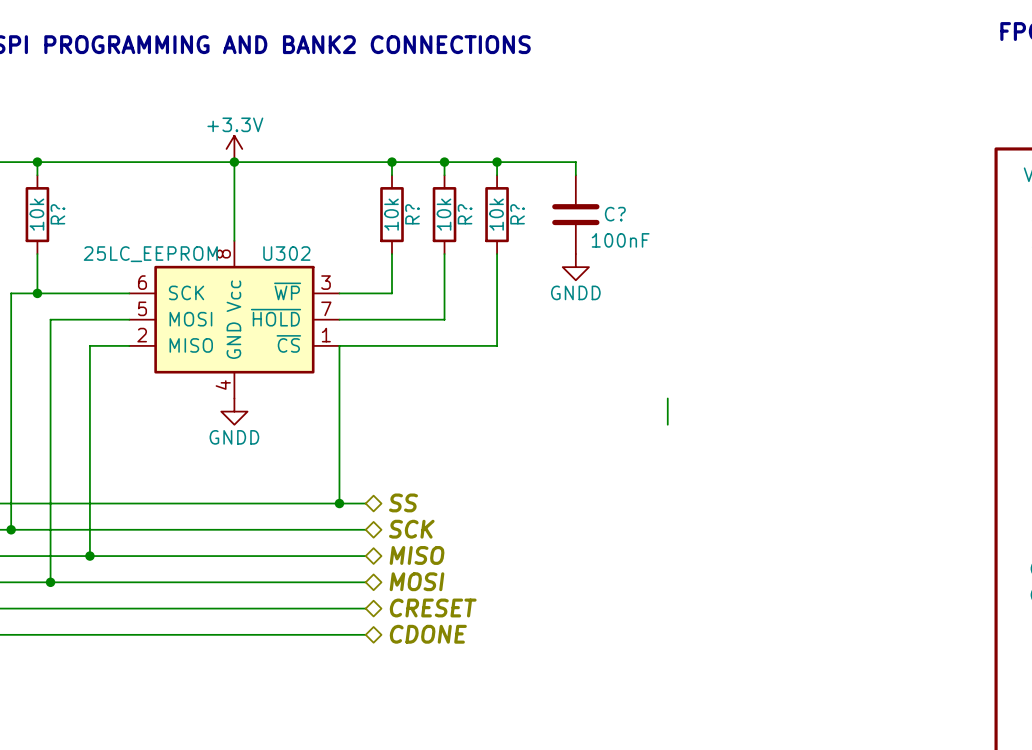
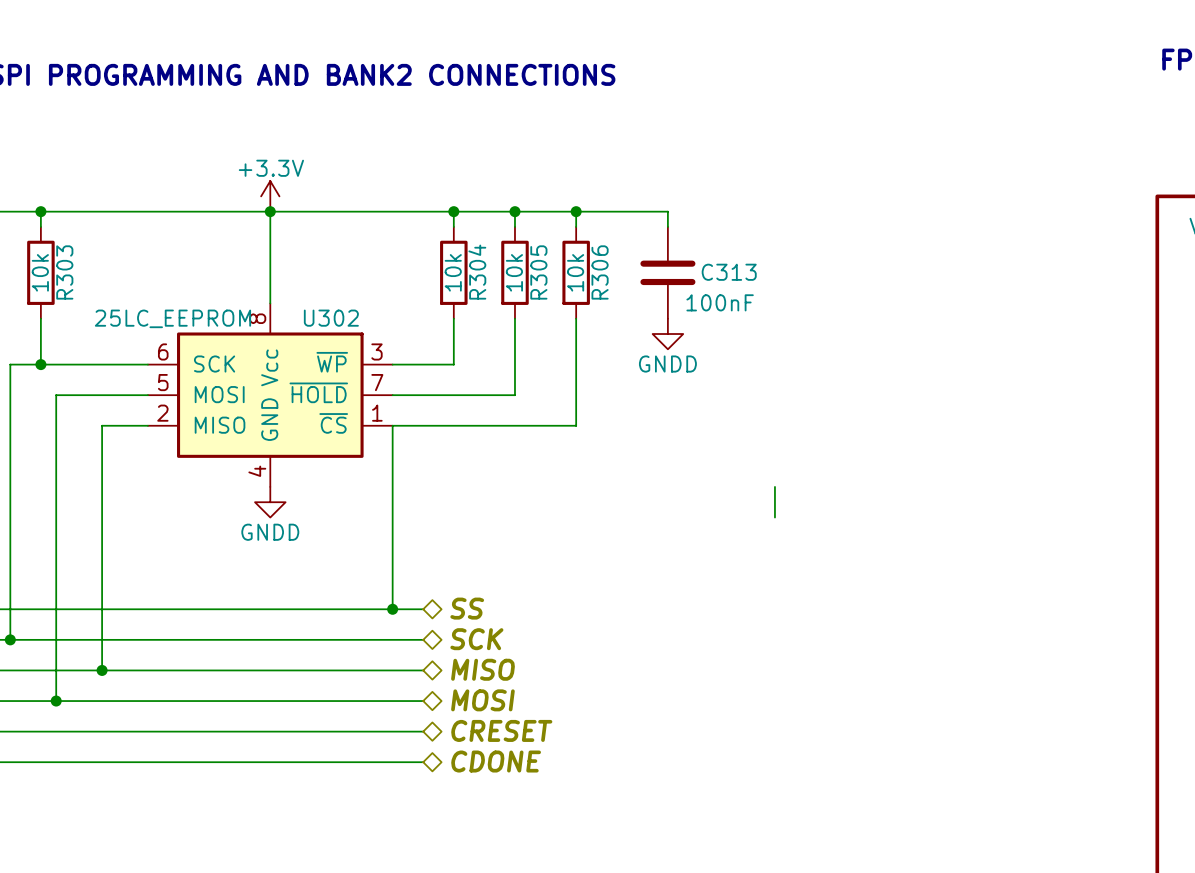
R? name: R? (57, 214) -> R303 (64, 272)
R? name: R? (412, 214) -> R304 (477, 272)
R? name: R? (465, 214) -> R305 (538, 272)
R? name: R? (517, 214) -> R306 (600, 272)
C? name: C? (615, 214) -> C313 (729, 272)

